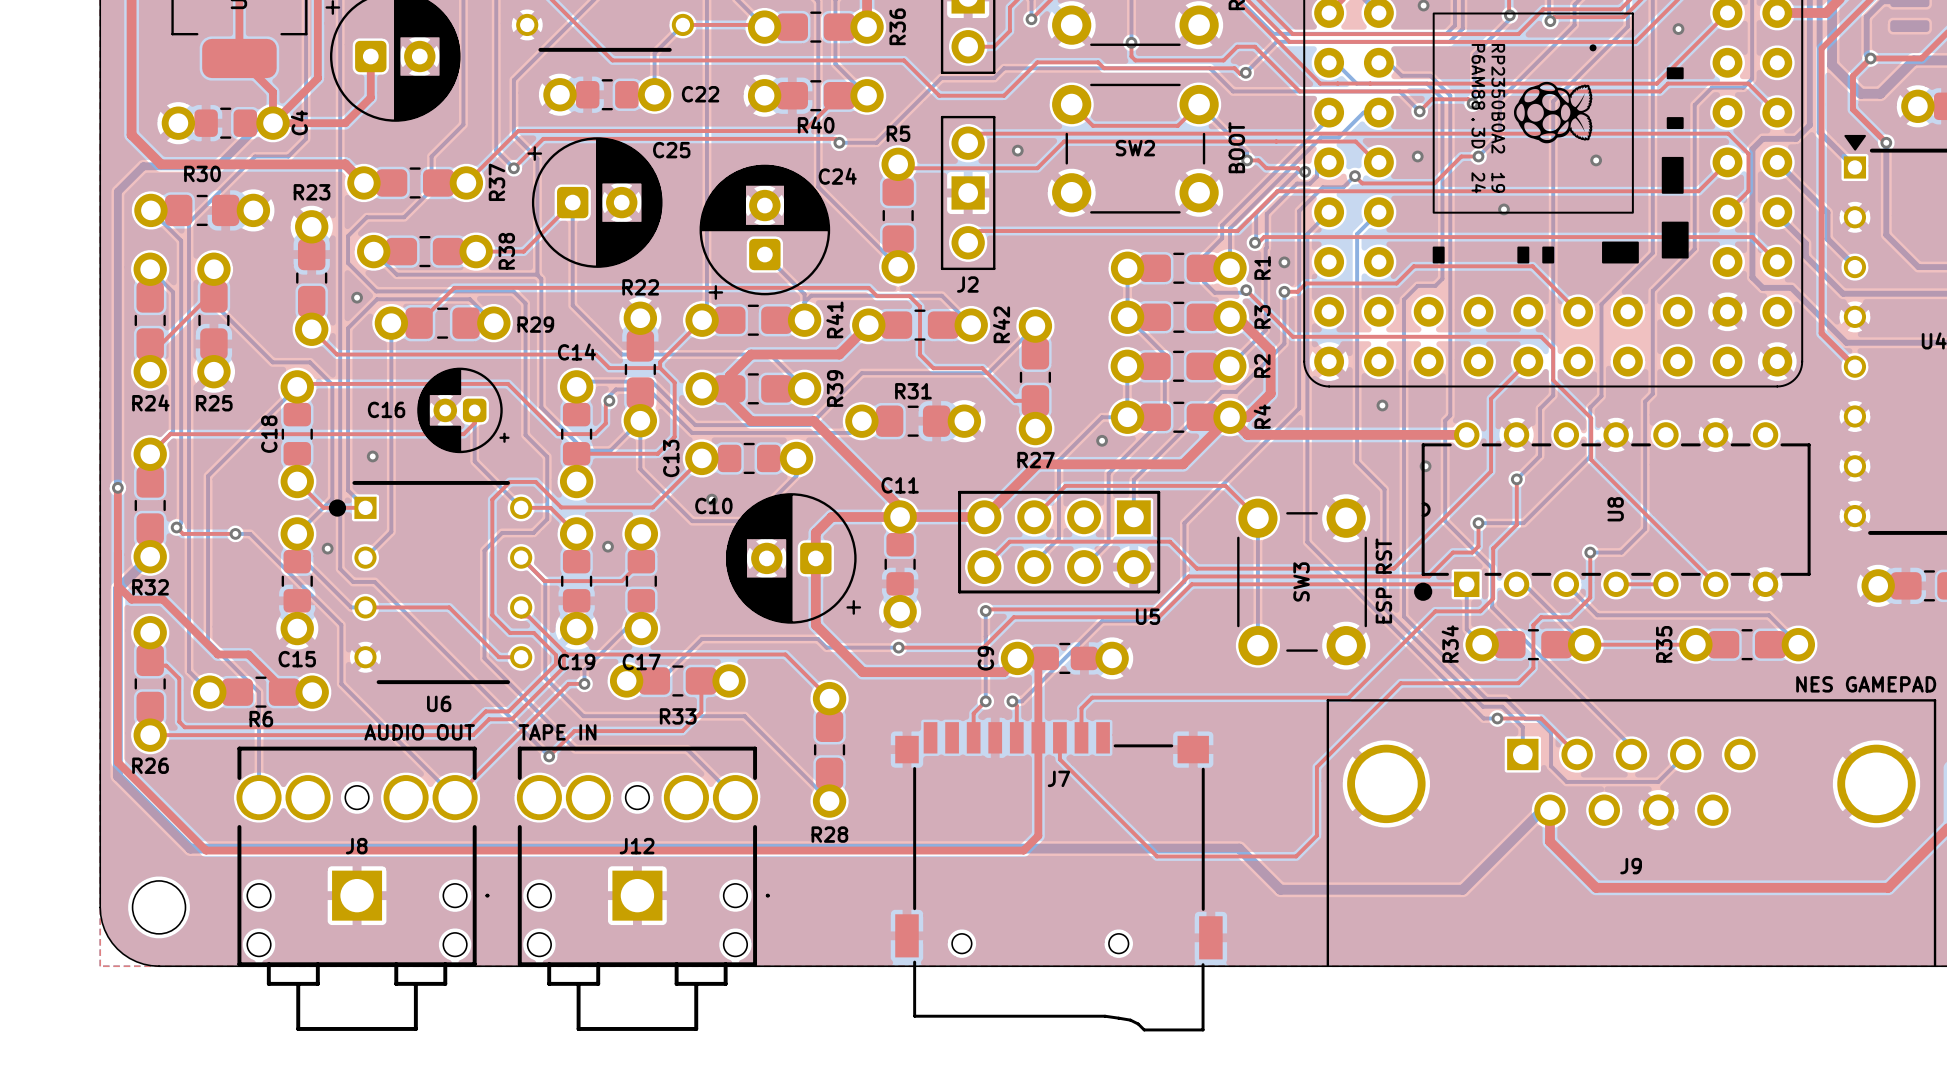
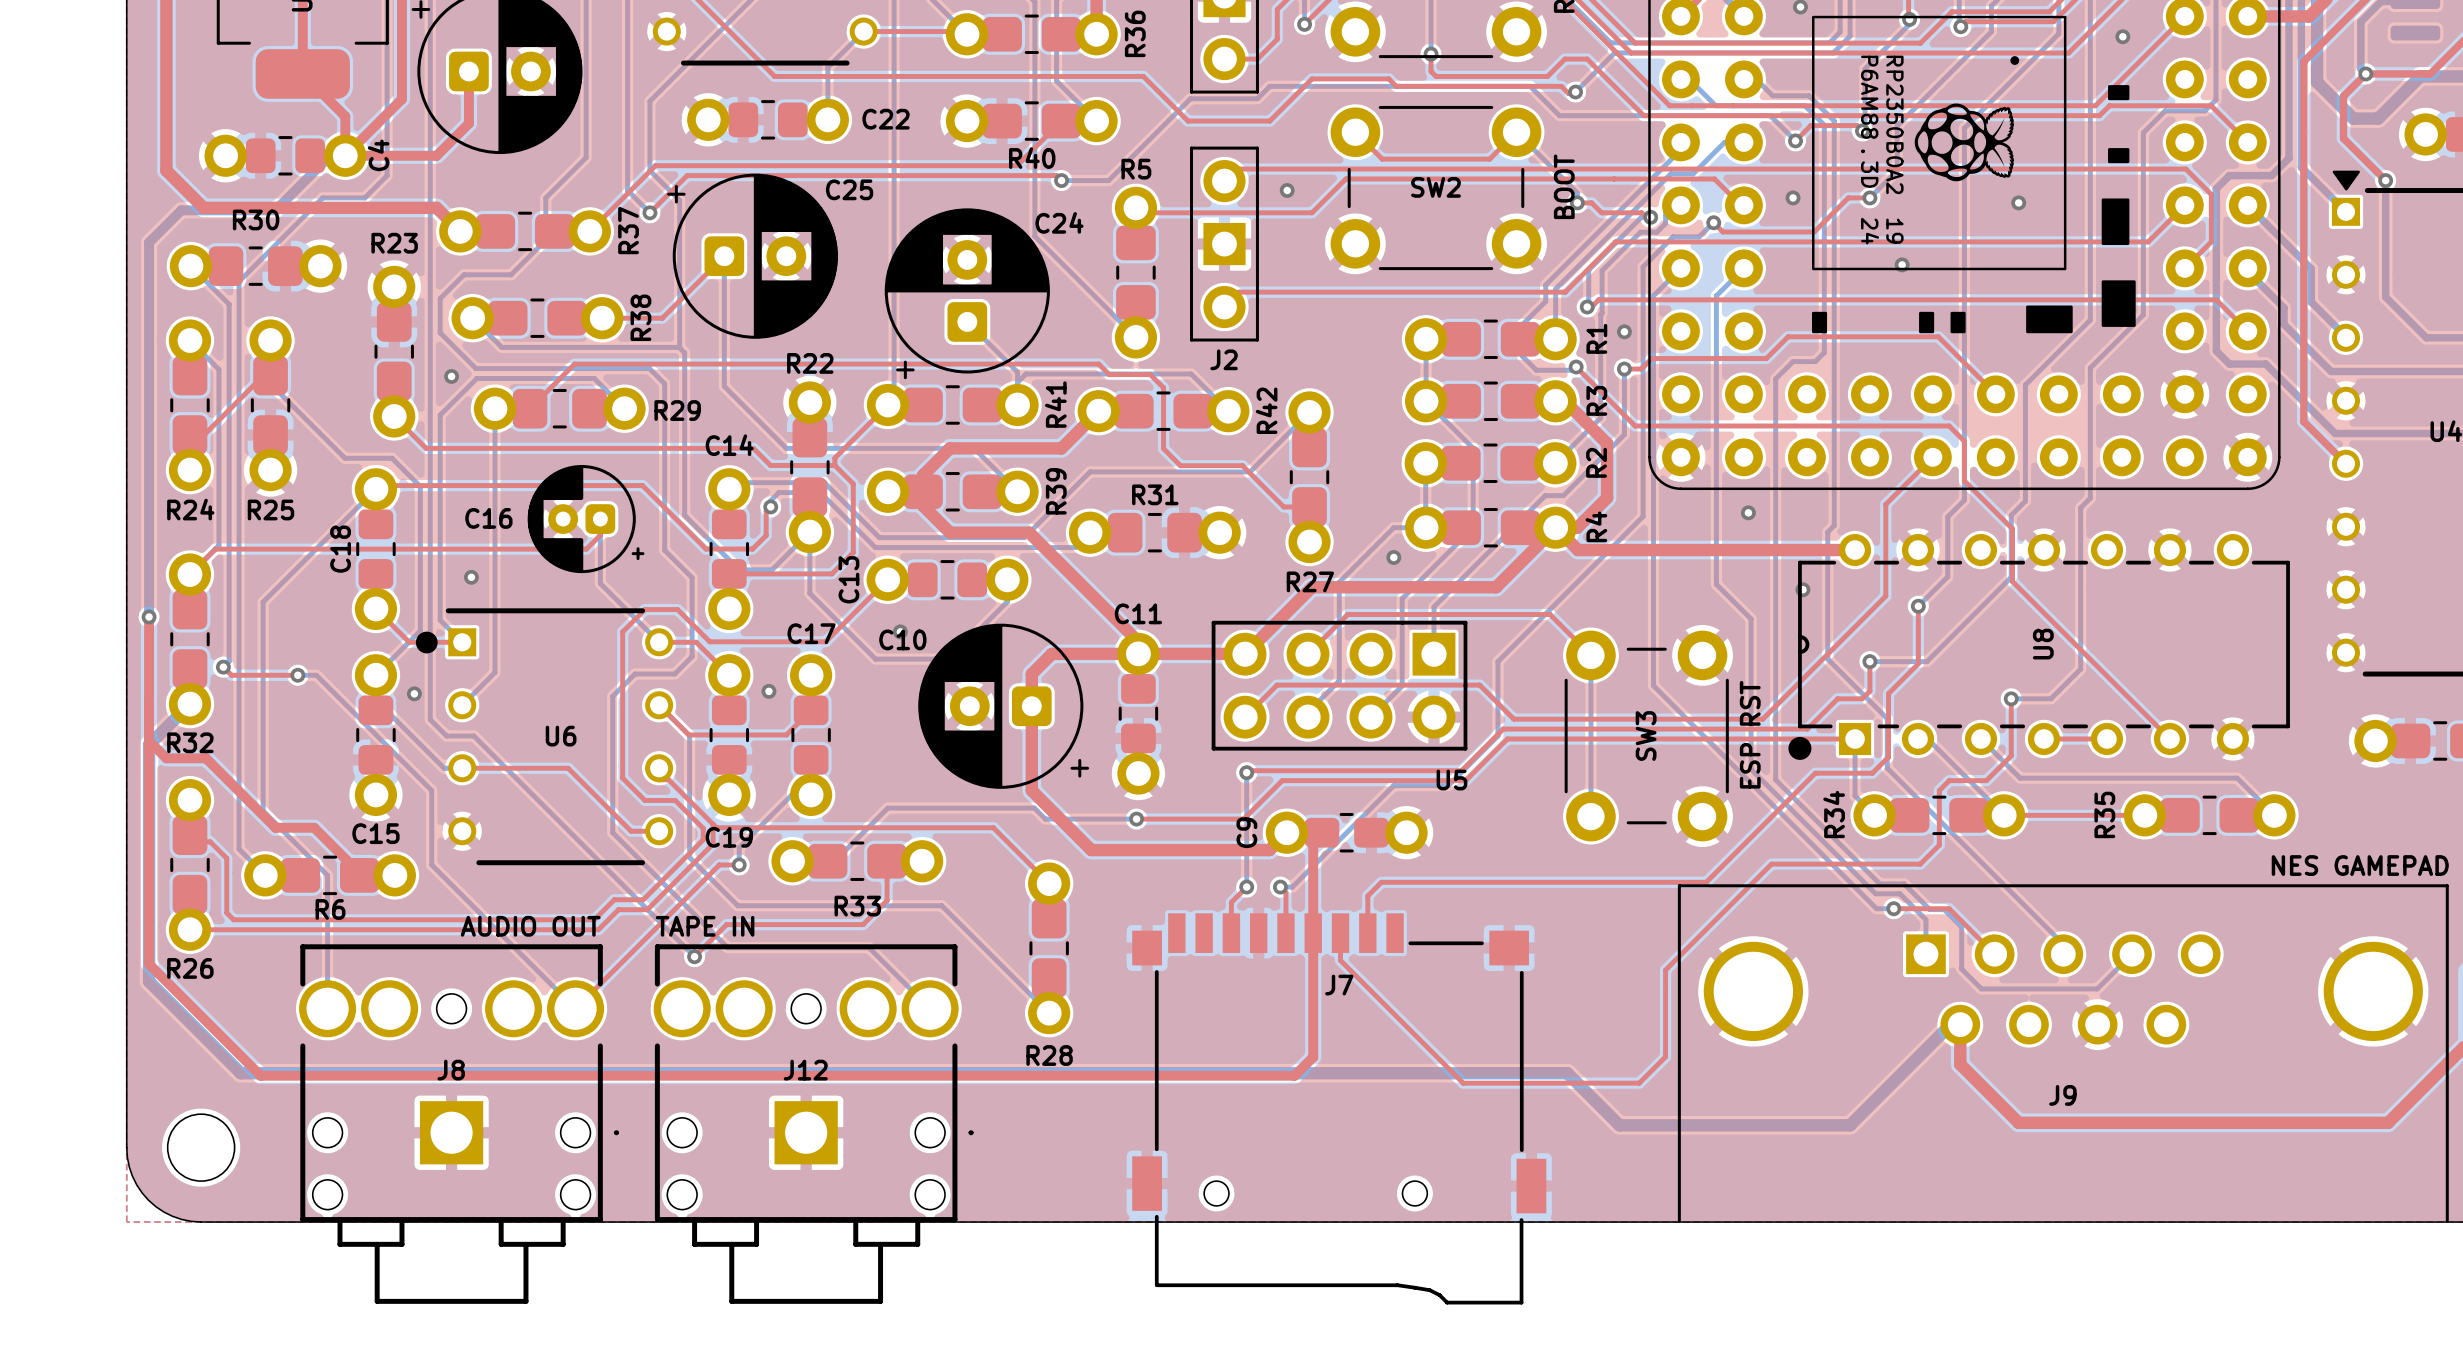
C17 name position: C17 (641, 662) -> C17 (811, 633)
U6 name position: U6 (439, 703) -> U6 (561, 736)

